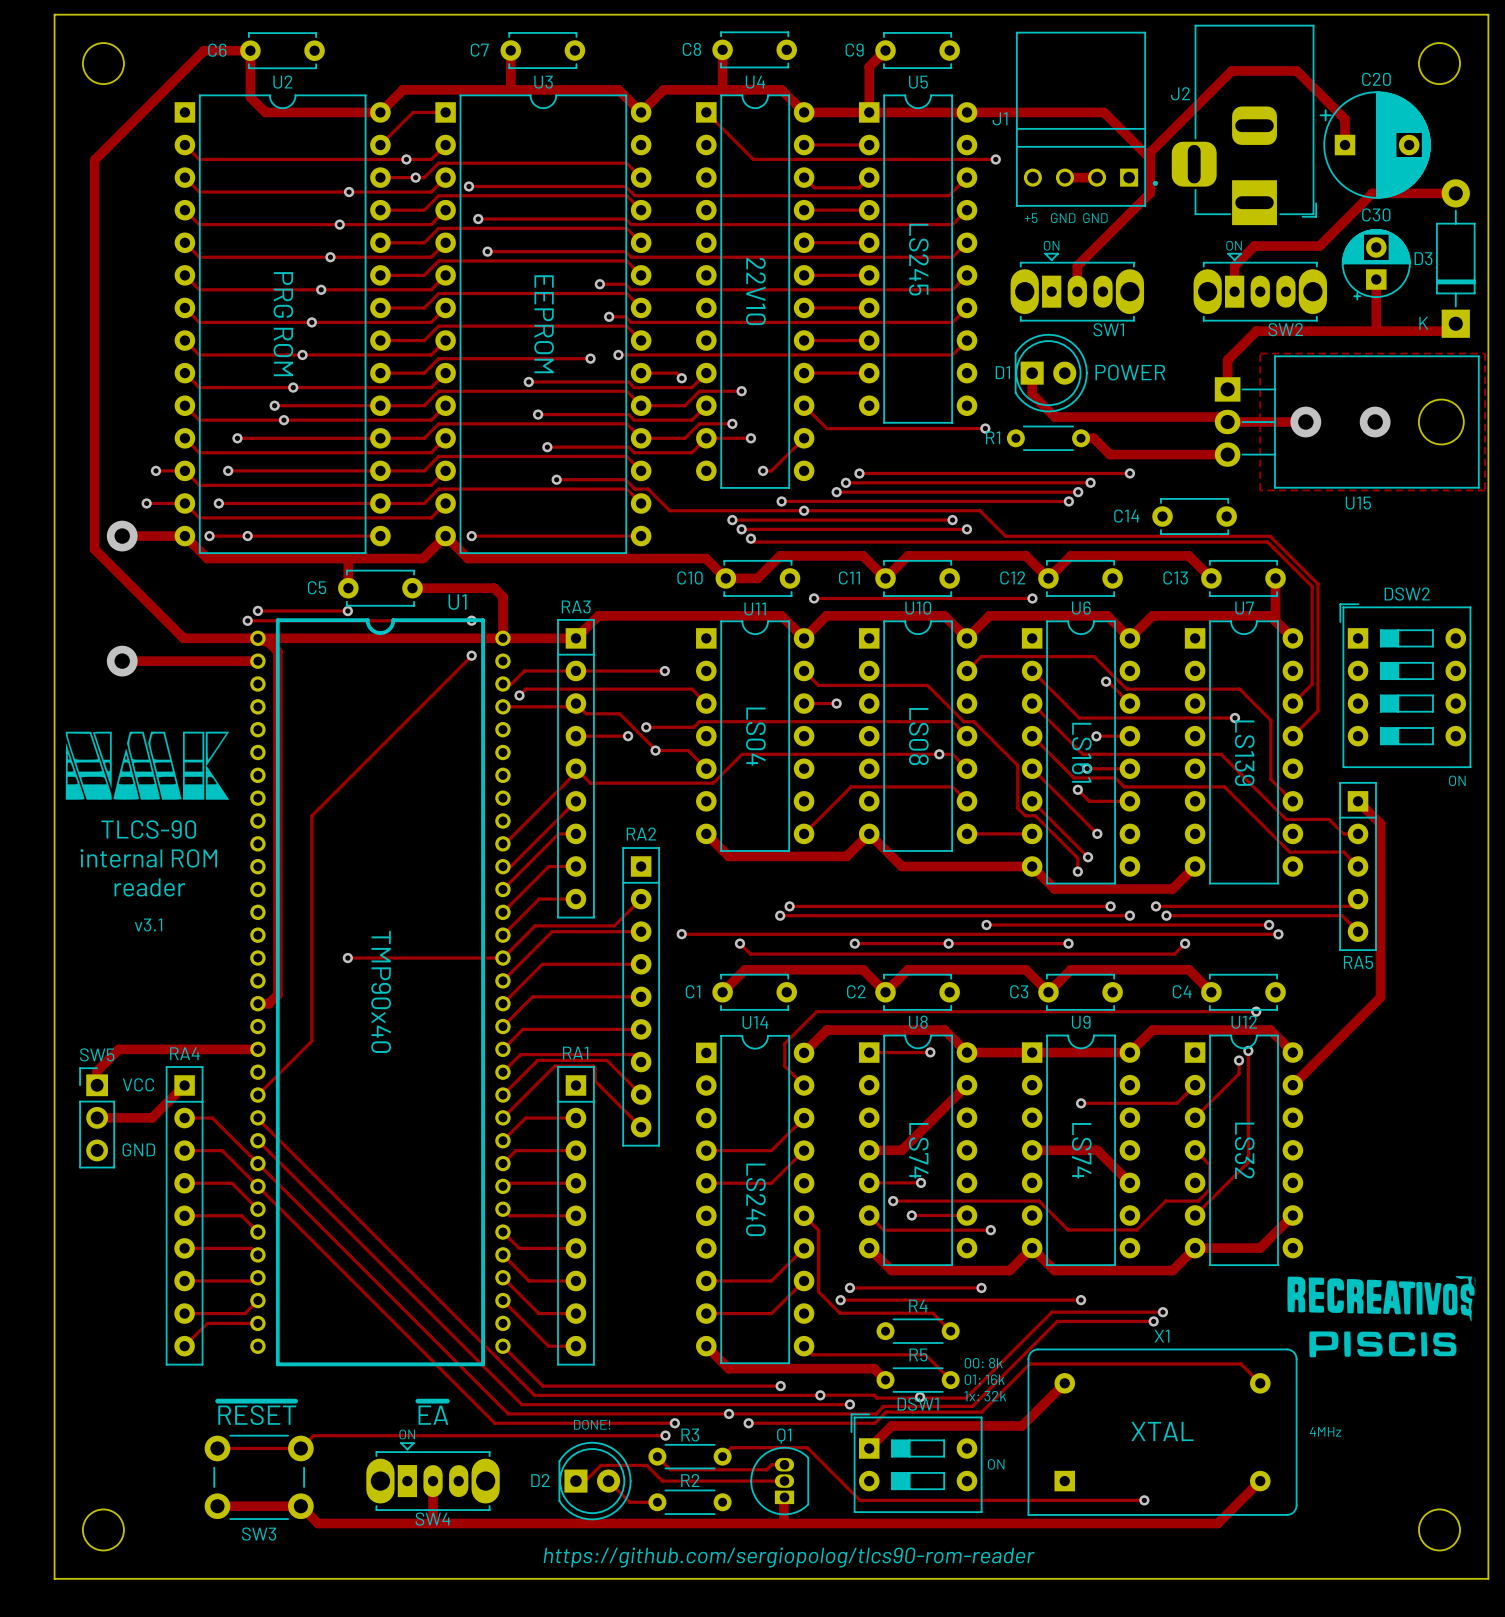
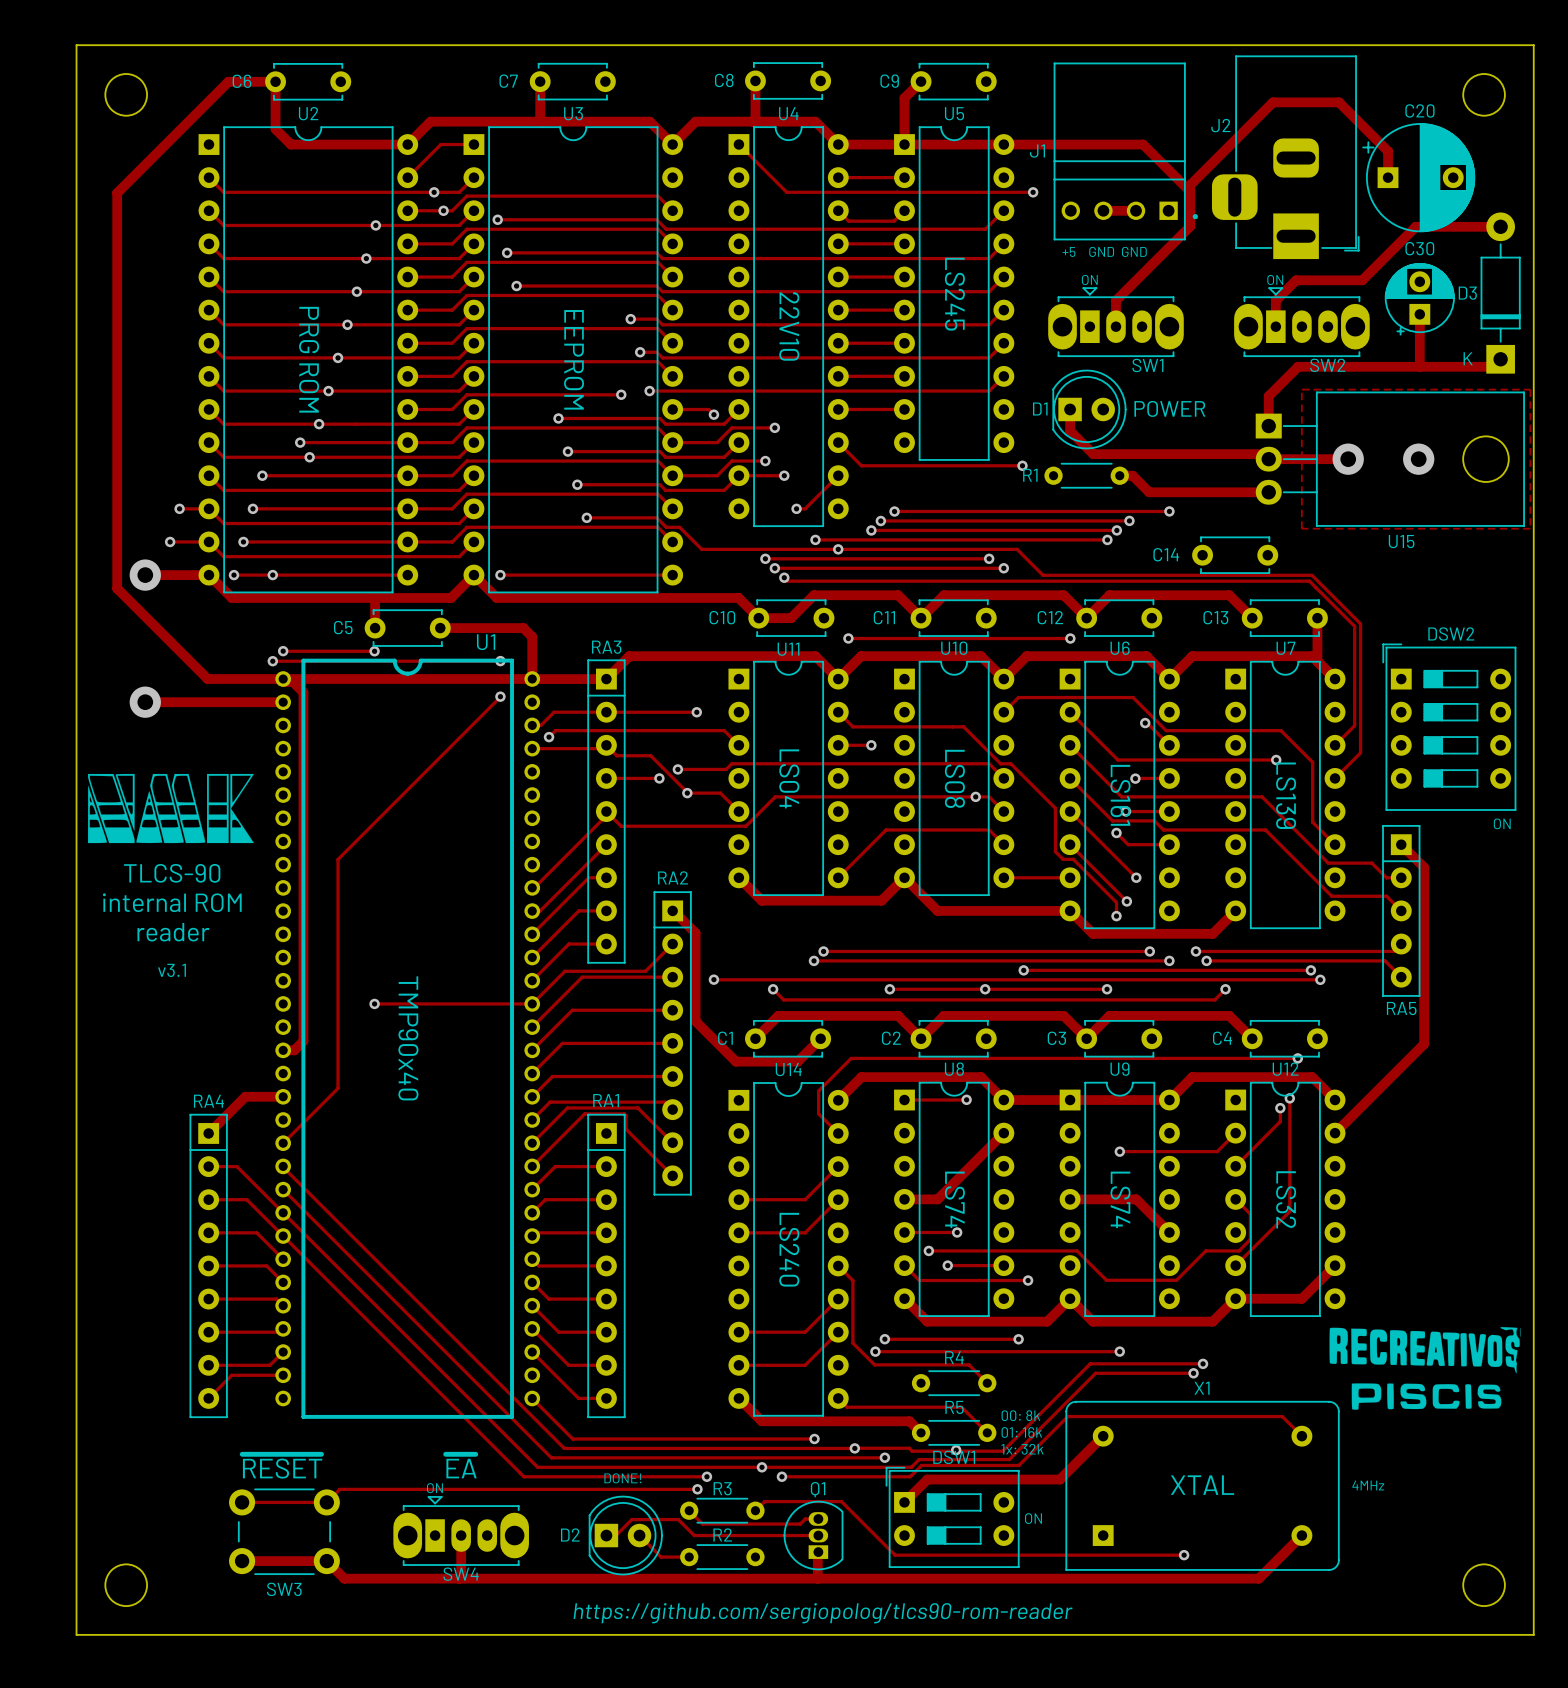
track: none -> (673, 910) (695, 933) (695, 1021) (735, 1061) (797, 1061) (820, 1038)
track: (220, 1049) (118, 1049) (97, 1071) (97, 1085) -> (245, 1096) (208, 1133)
text: VCC (138, 1084) -> none
track: (184, 1085) (152, 1117) (97, 1117) -> none
SW5: (97, 1117) -> none
text: GND (138, 1149) -> none

